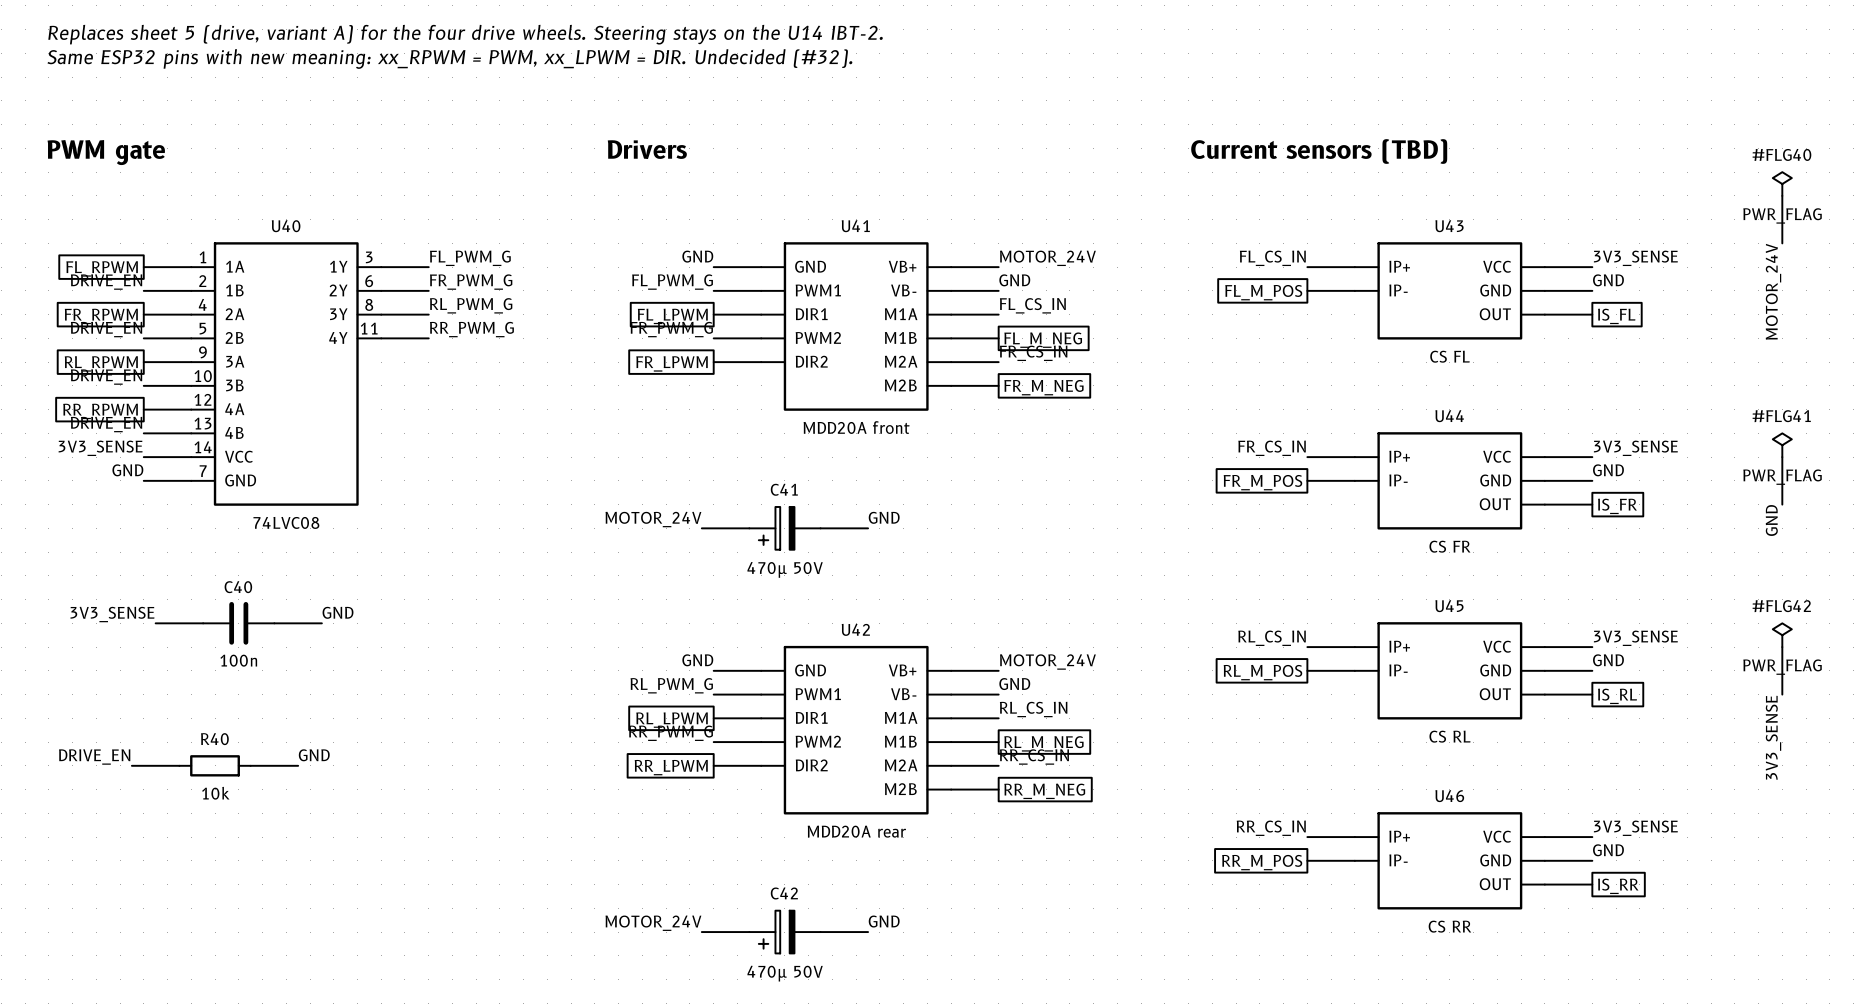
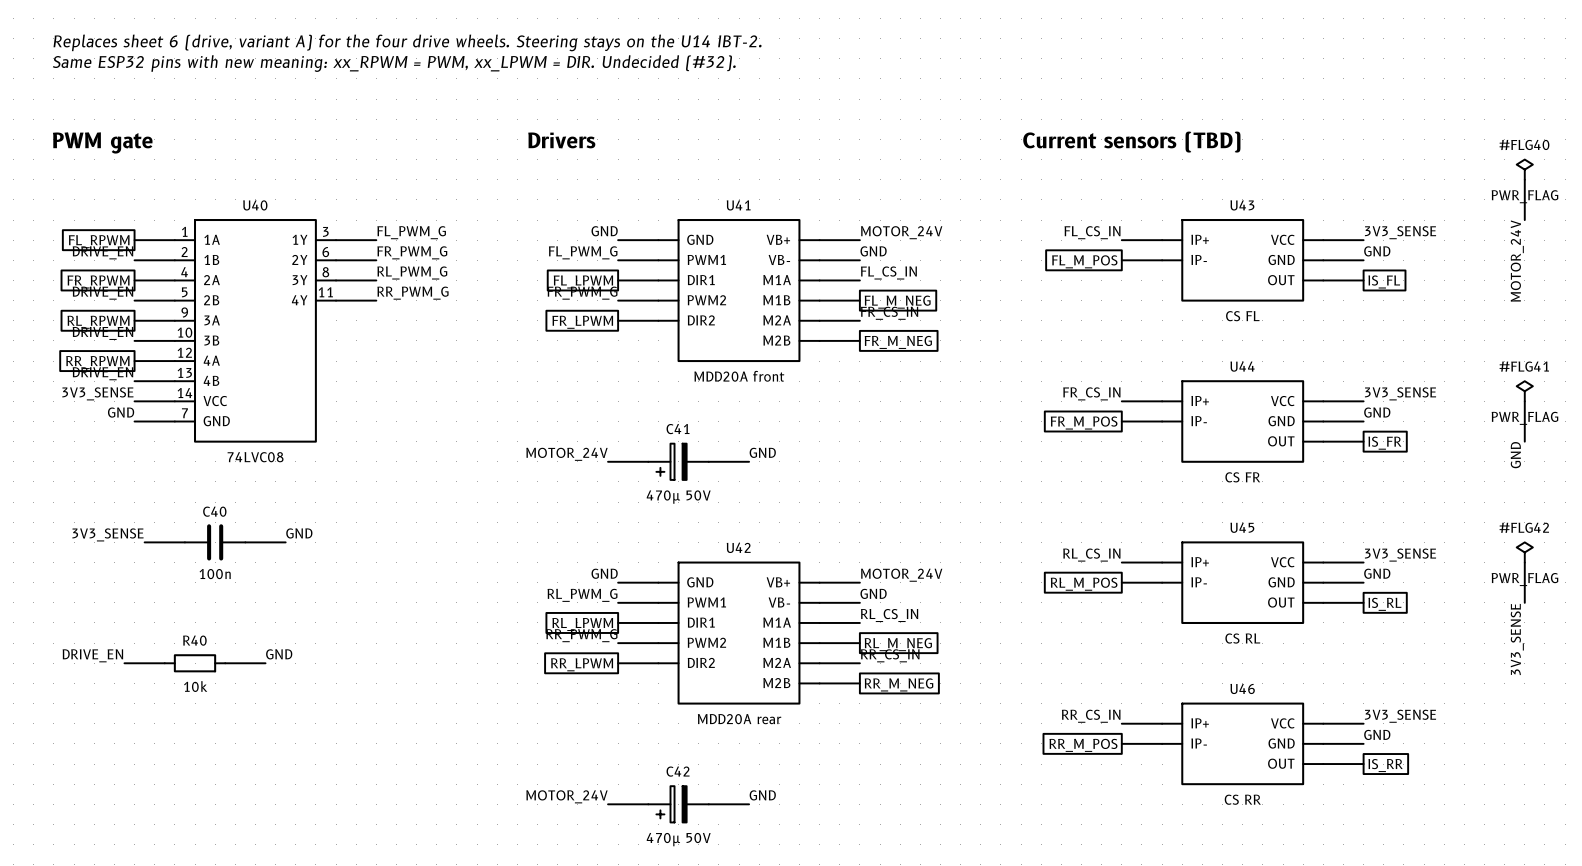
text: Replaces sheet 5 (drive, variant A) for the four drive wheels. Steering stays on the U14 IBT-2. (465, 34) -> Replaces sheet 6 (drive, variant A) for the four drive wheels. Steering stays on the U14 IBT-2. (407, 42)

